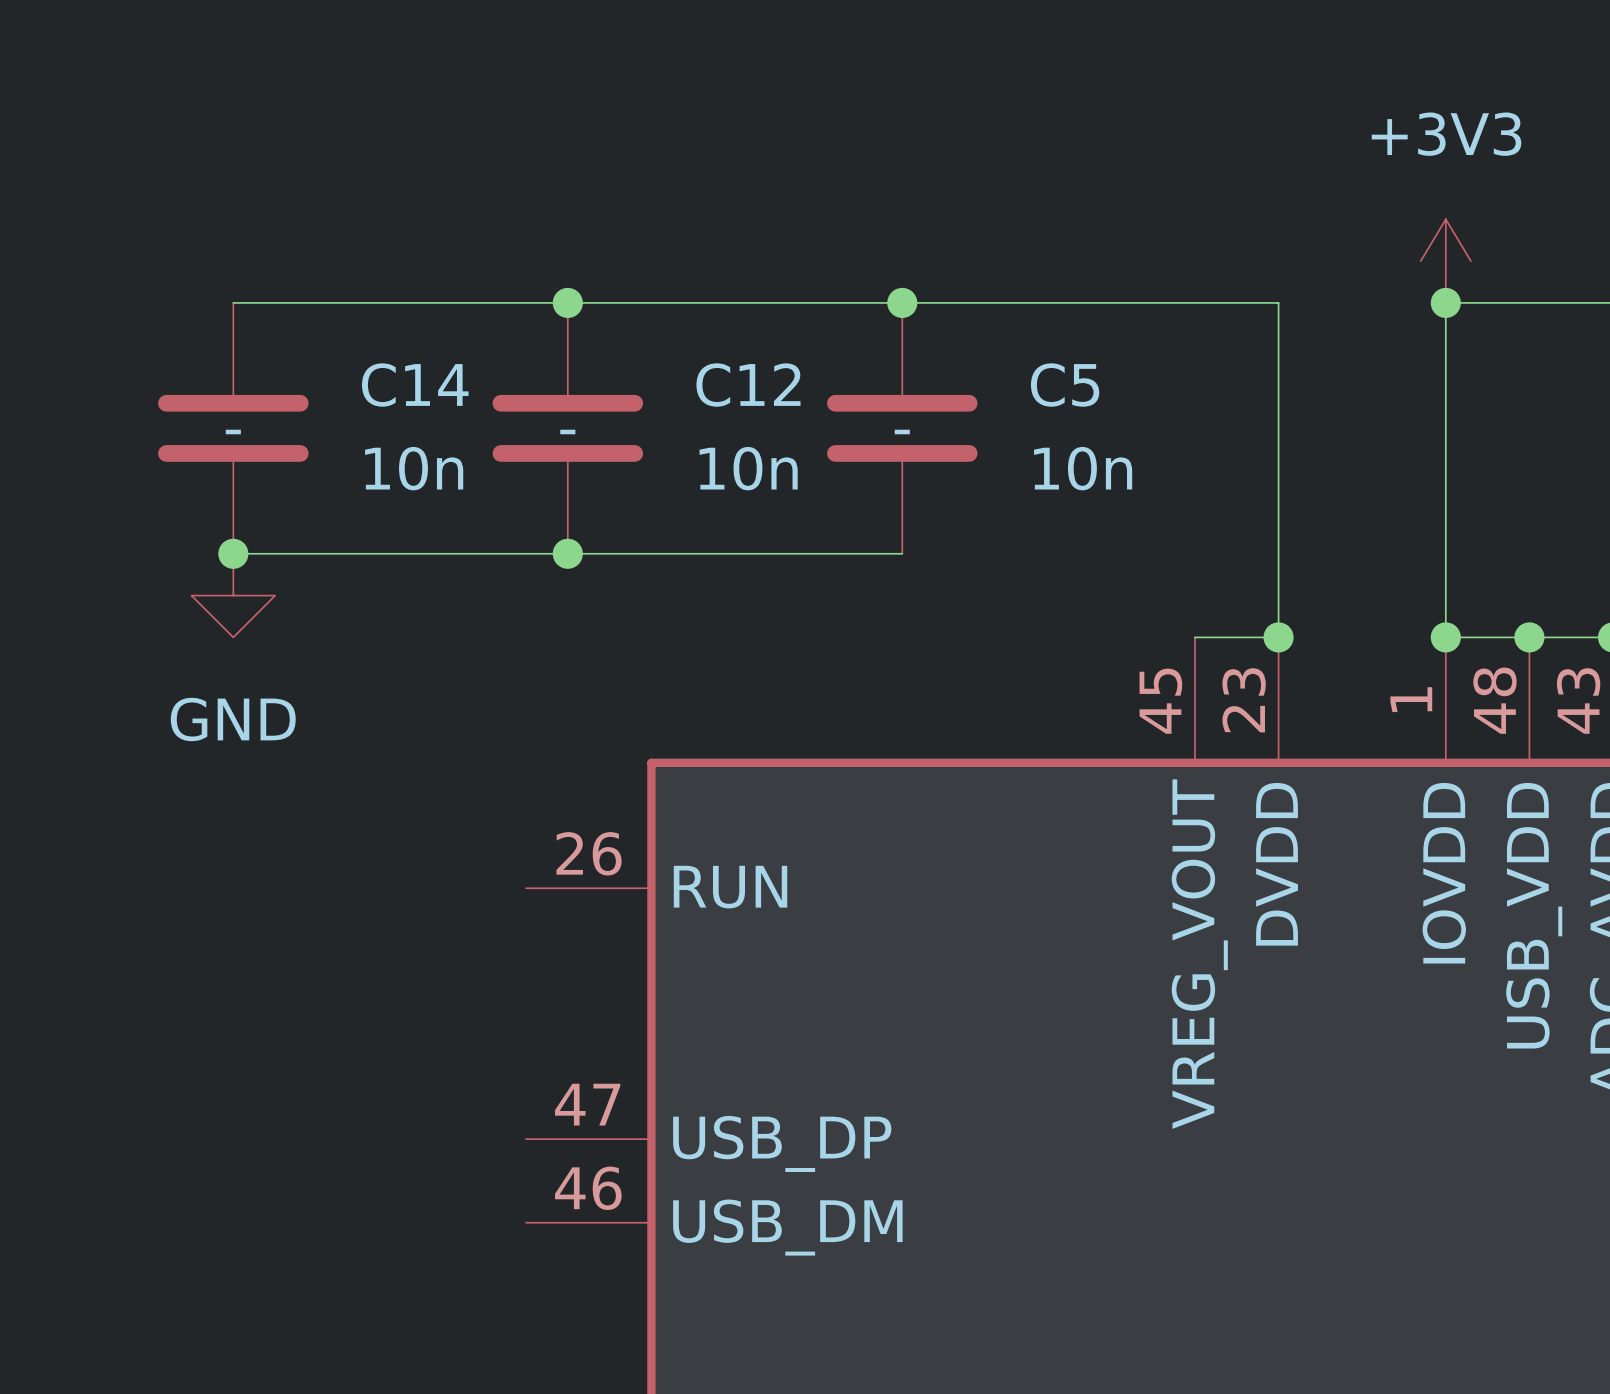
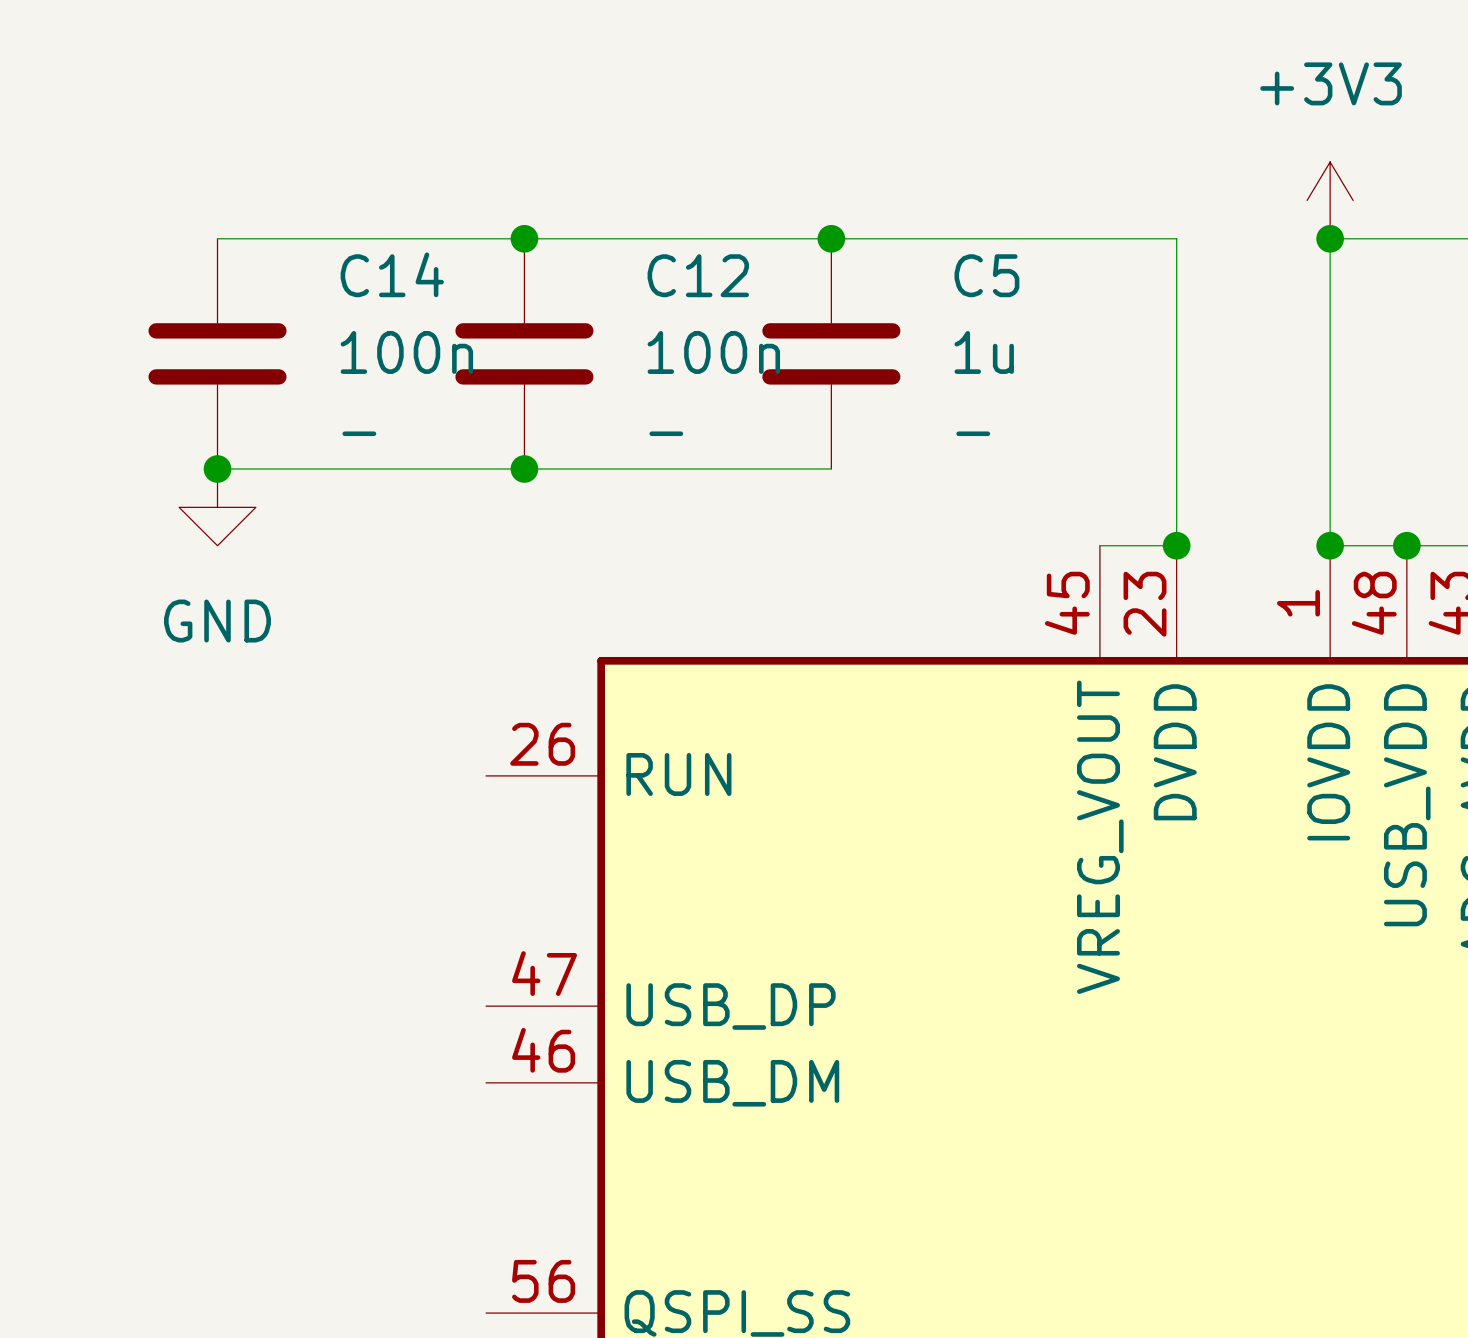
C14 name position: C14 (415, 385) -> C14 (392, 274)
C12 name position: C12 (748, 385) -> C12 (698, 275)
C5 name position: C5 (1065, 385) -> C5 (986, 275)
C14 text position: - (233, 431) -> - (359, 433)
C12 text position: - (567, 431) -> - (666, 433)
C5 text position: - (902, 431) -> - (973, 433)
C14 value: 10n (414, 468) -> 100n (406, 352)
C12 value: 10n (748, 468) -> 100n (713, 352)
C5 value: 10n (1083, 468) -> 1u (984, 352)

